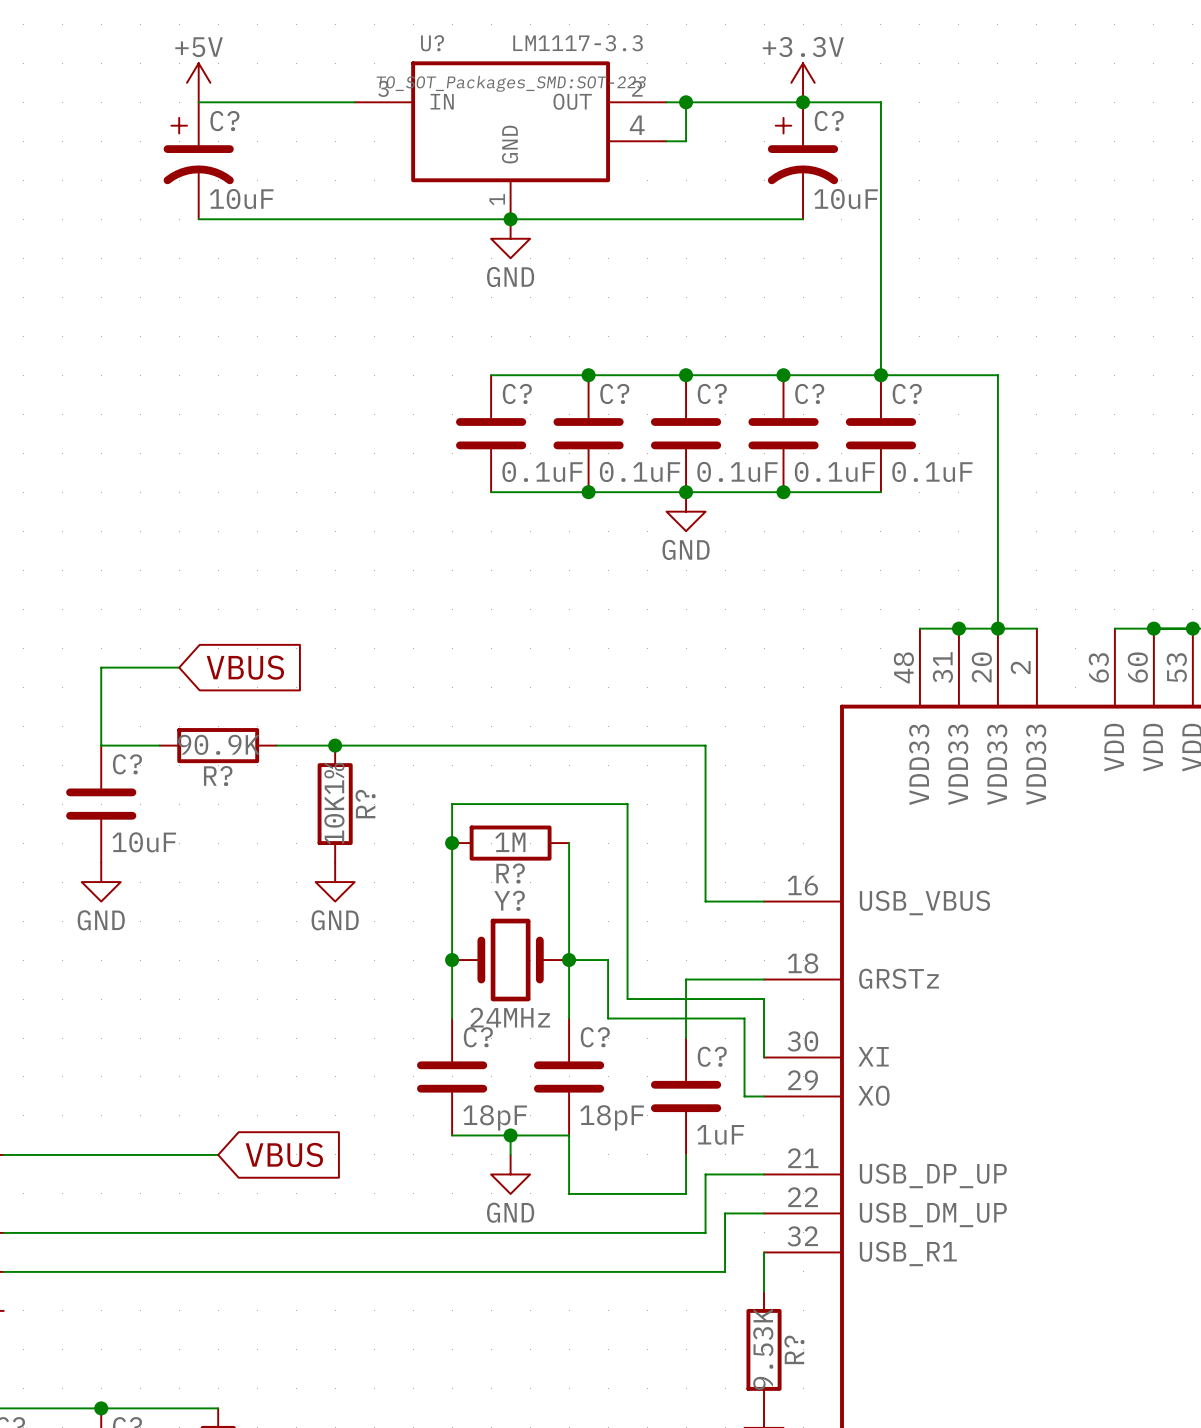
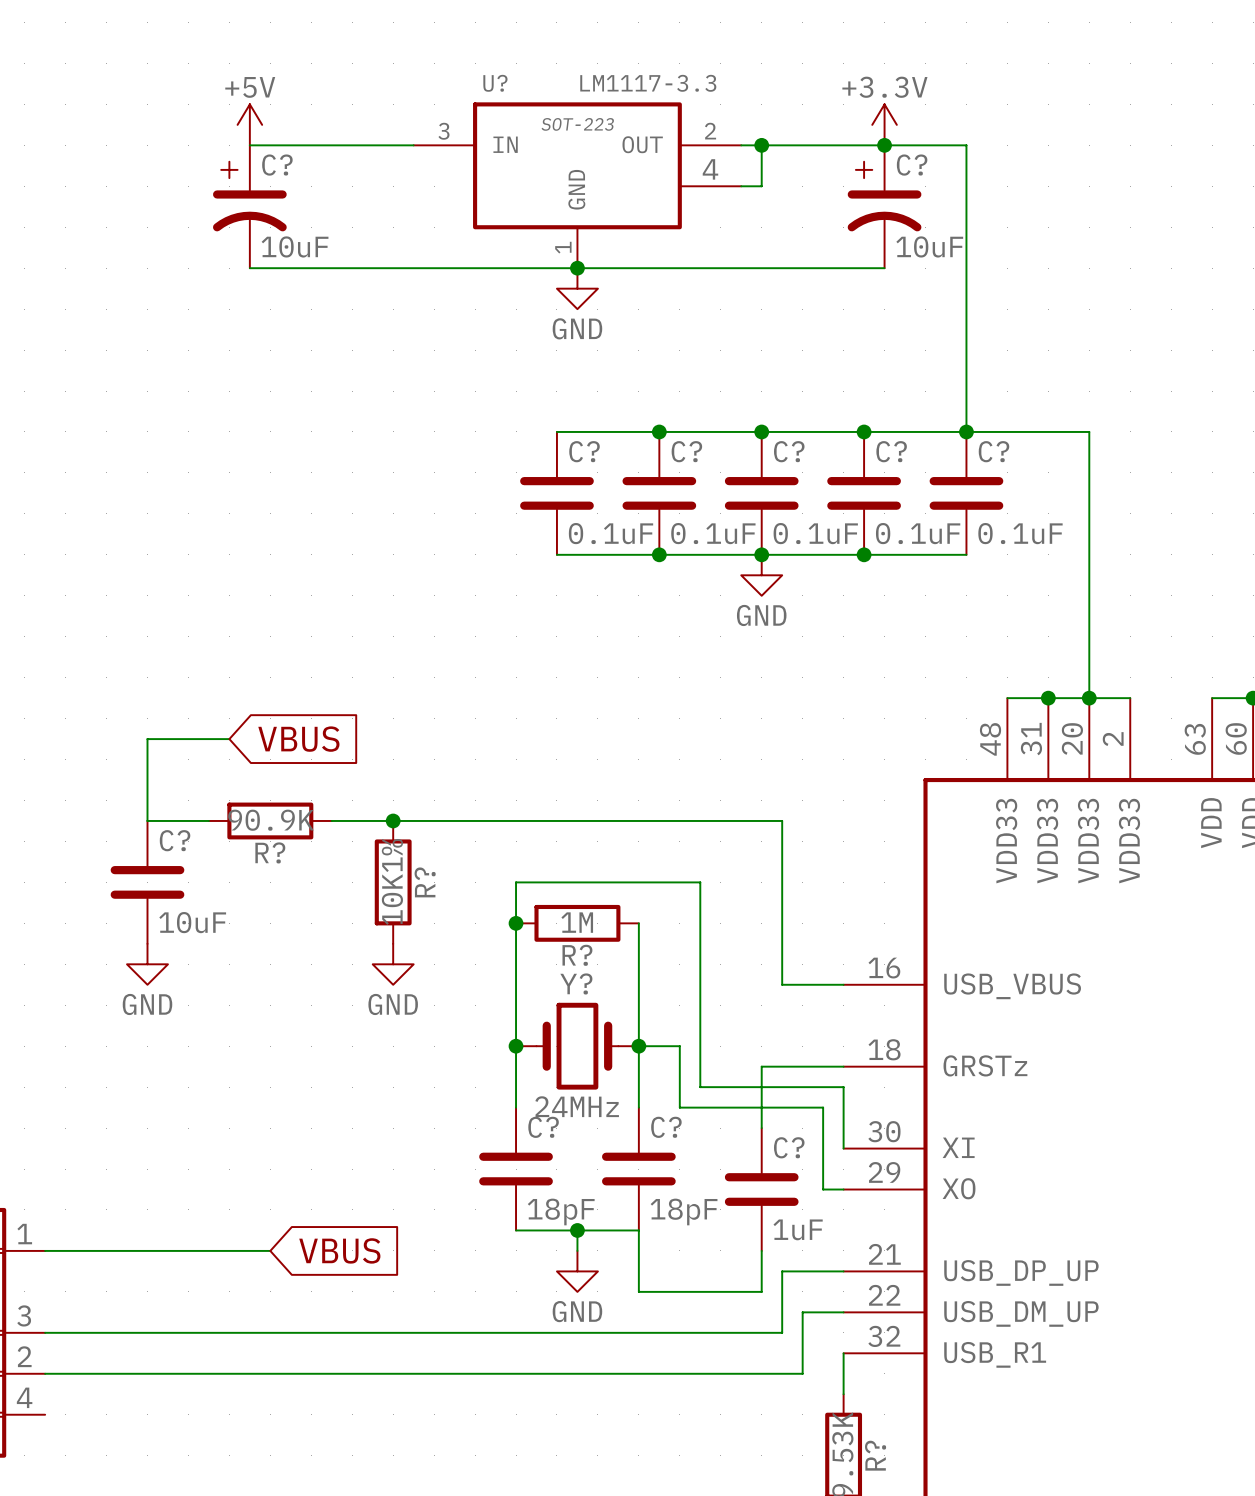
U? text: TO_SOT_Packages_SMD:SOT-223 (511, 83) -> SOT-223 (577, 124)

